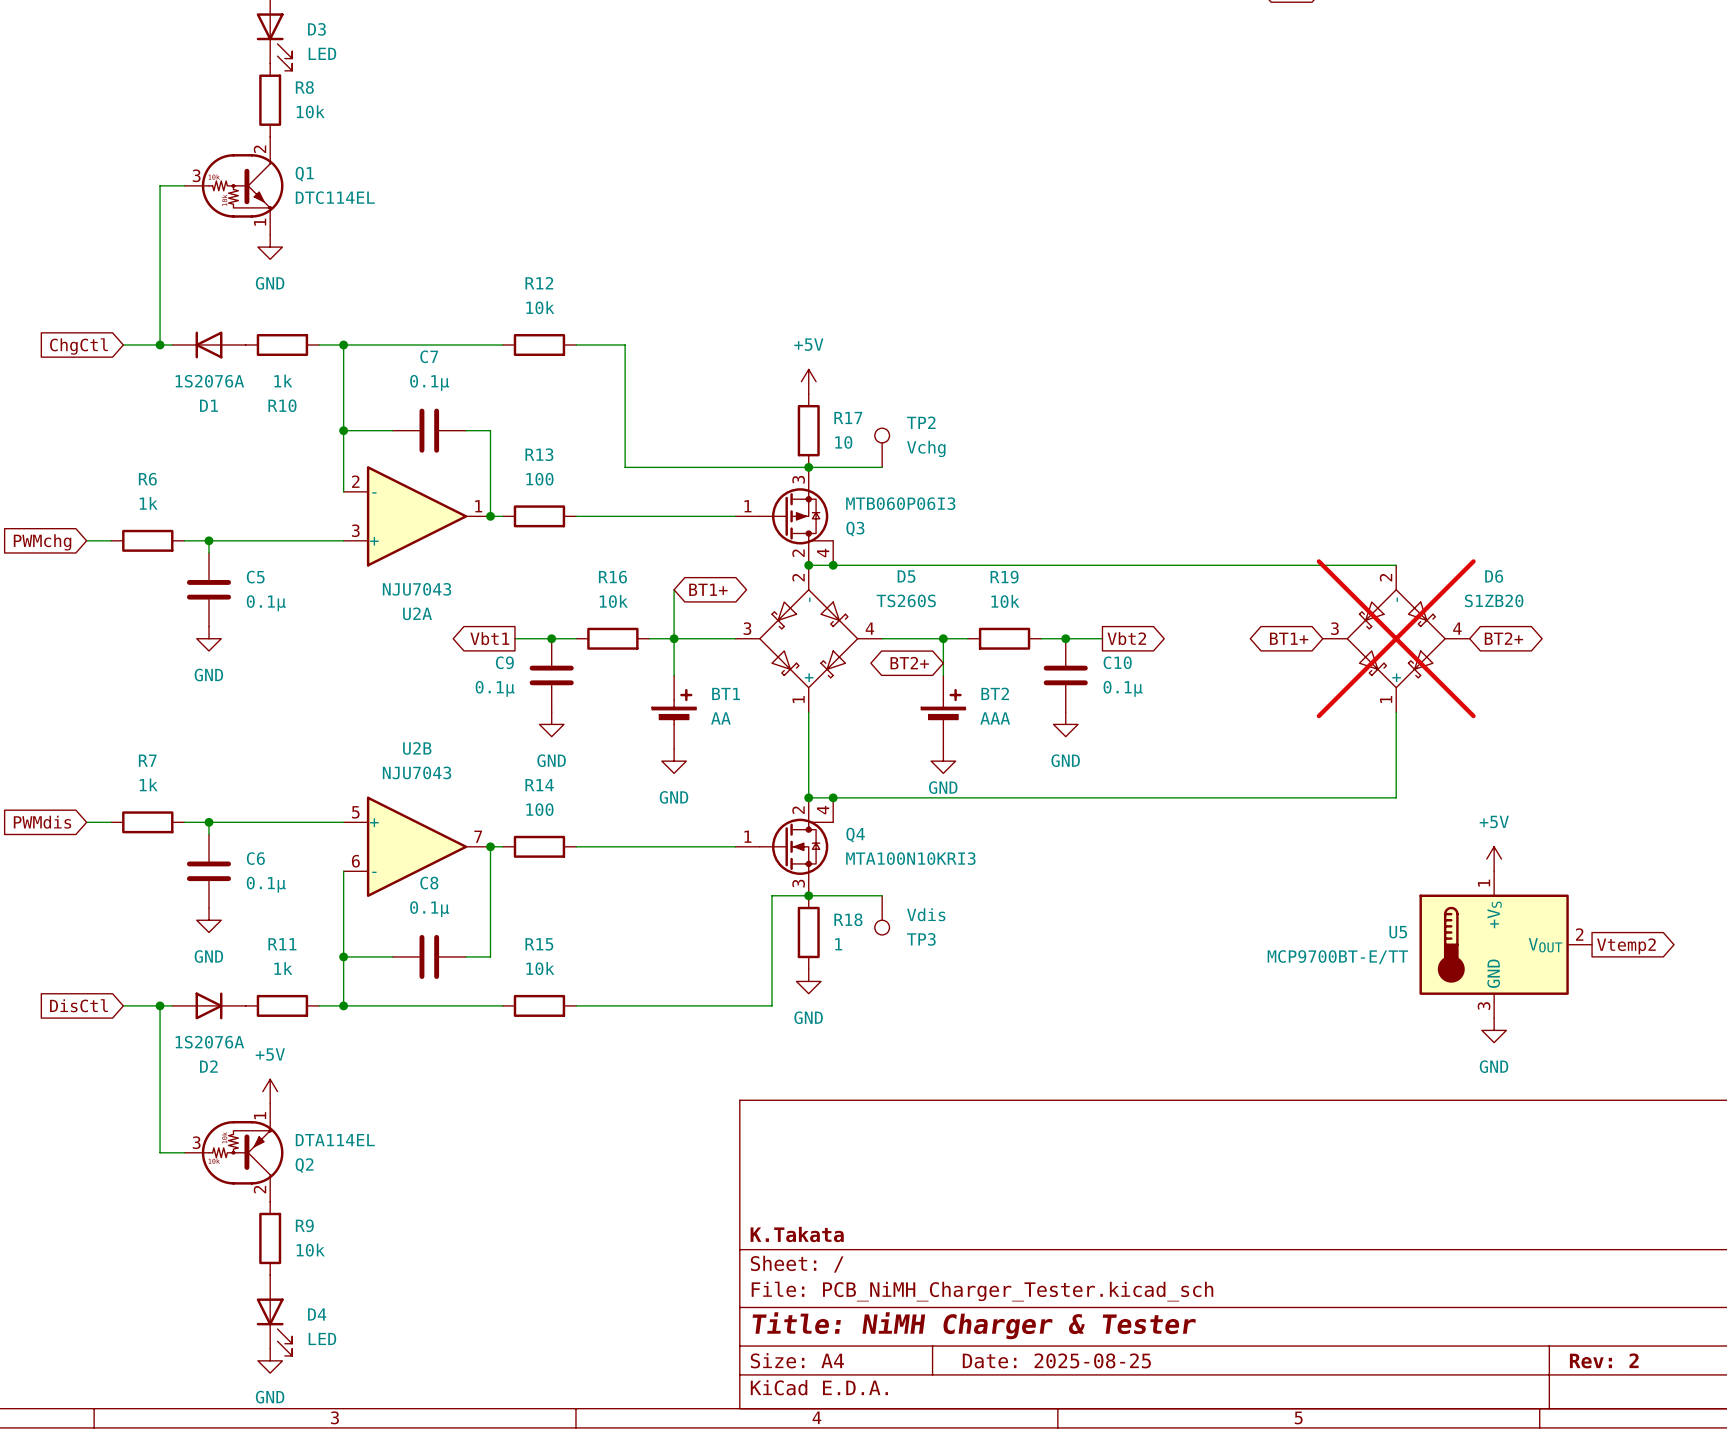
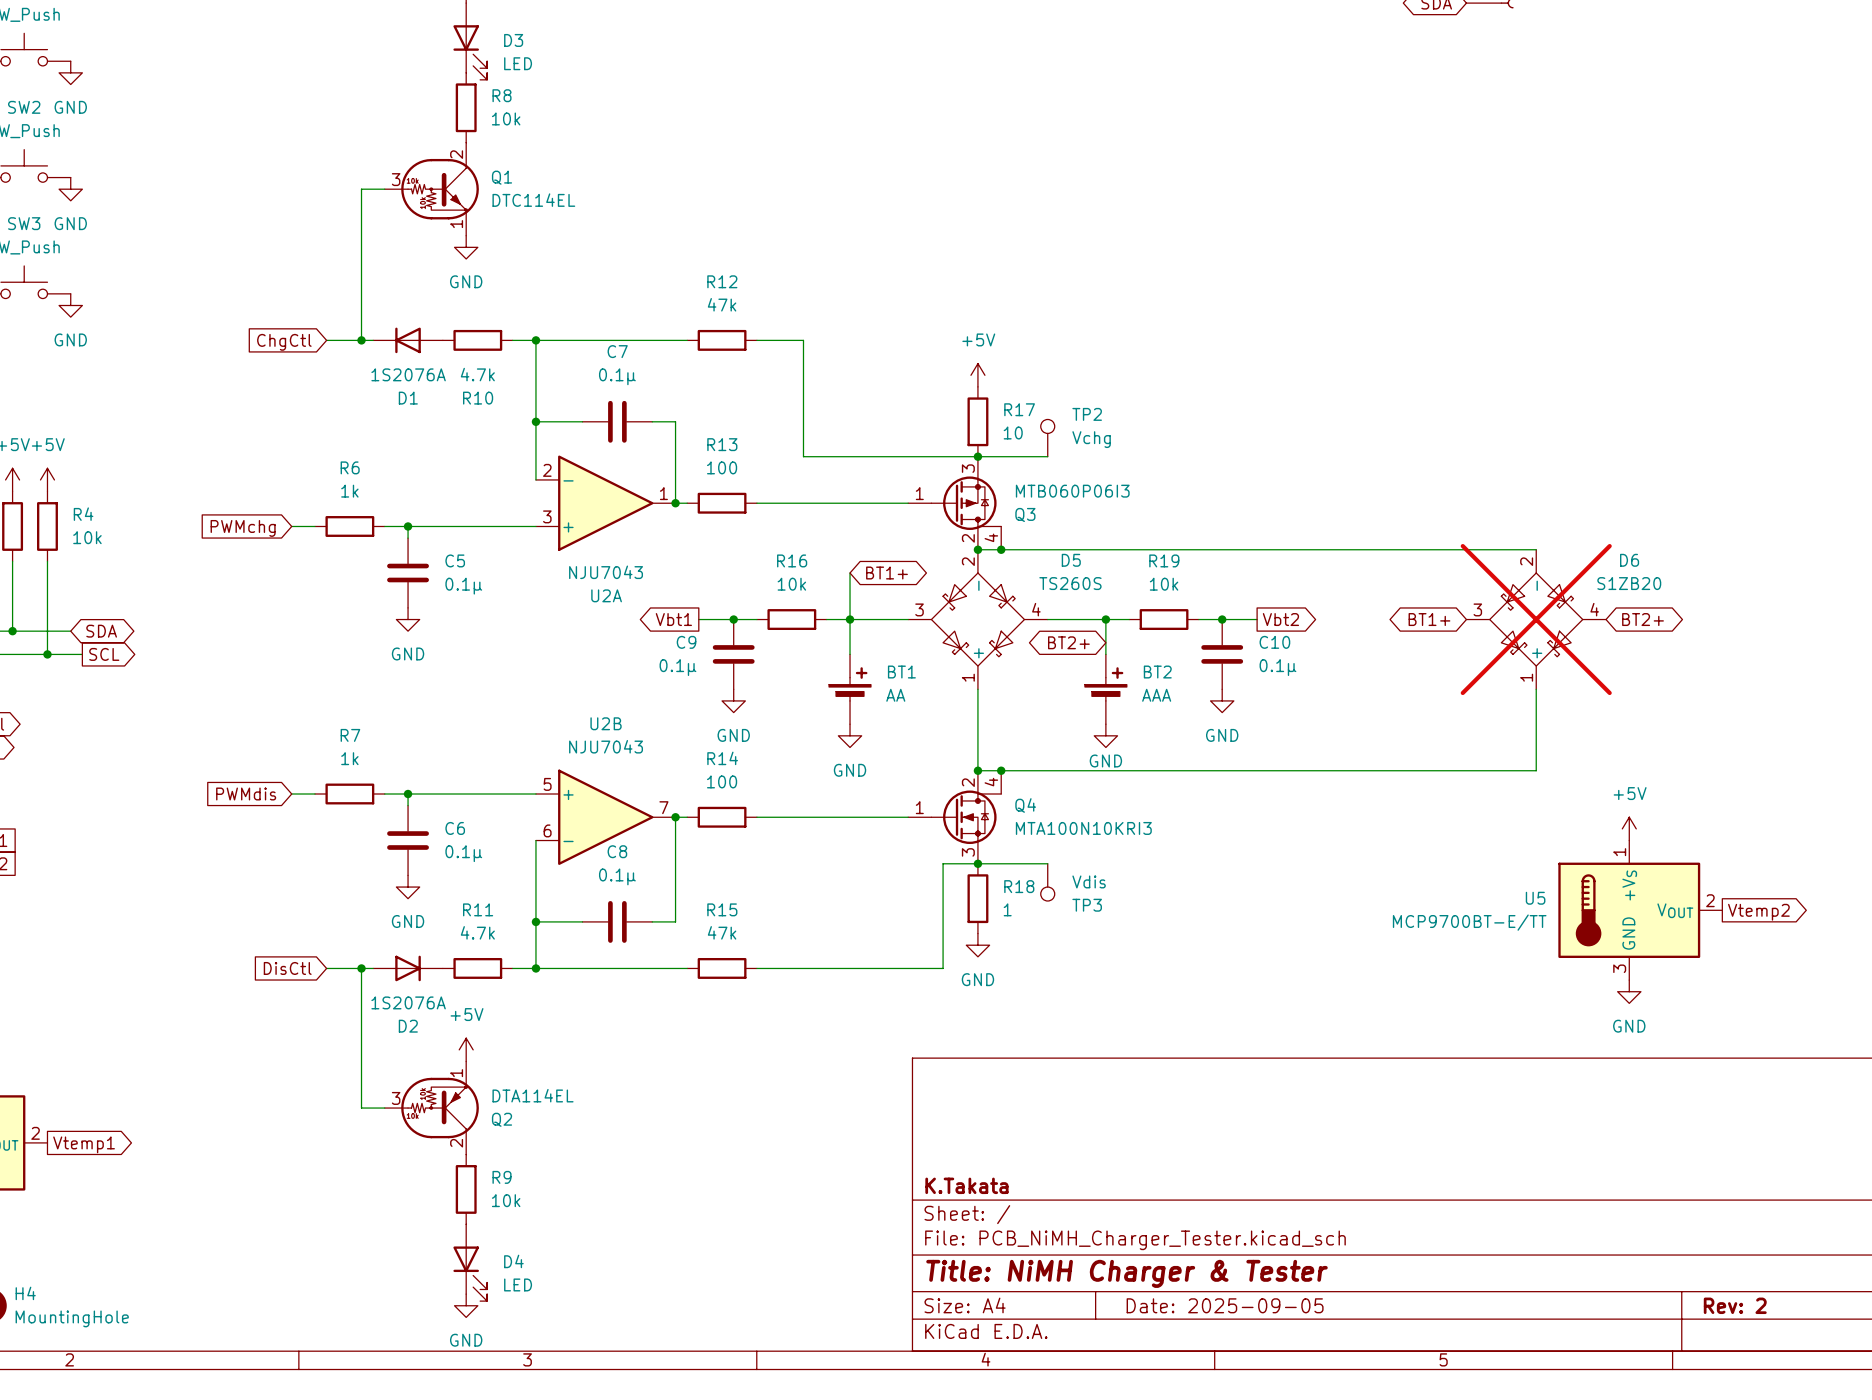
R12 value: 10k (540, 307) -> 47k (722, 304)
R10 value: 1k (283, 381) -> 4.7k (477, 374)
R11 value: 1k (283, 968) -> 4.7k (477, 932)
R15 value: 10k (540, 968) -> 47k (722, 932)
title block: Date: 2025-08-25 (1056, 1360) -> Date: 2025-09-05 (1225, 1305)

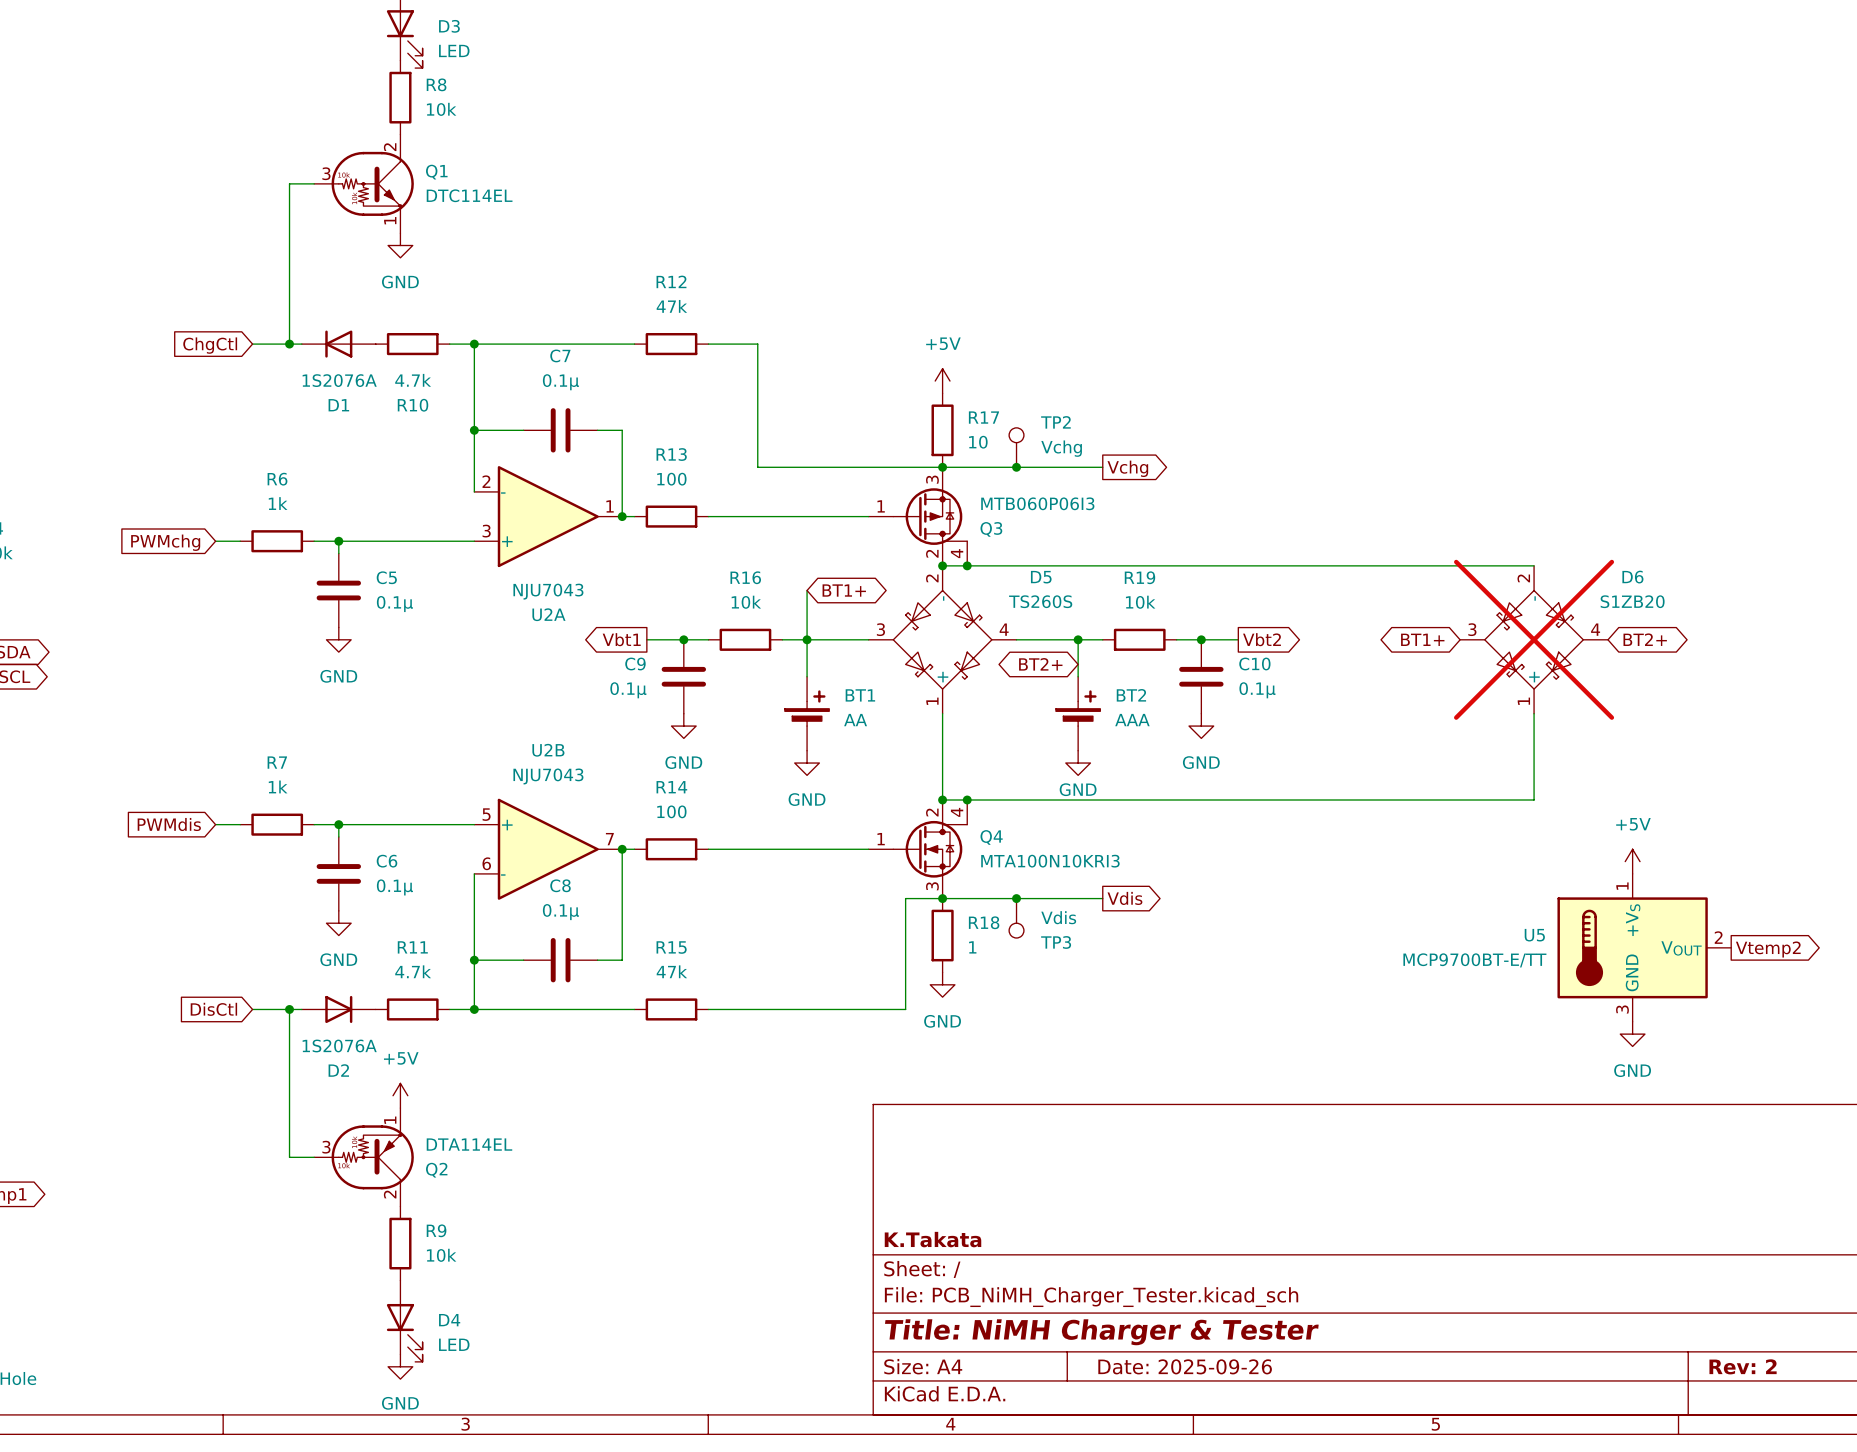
wire: none -> (1016, 467) (1102, 467)
junction: none -> (1016, 467)
global label: none -> Vchg (1127, 468)
wire: none -> (1016, 898) (1102, 898)
junction: none -> (1016, 898)
global label: none -> Vdis (1124, 898)
title block: Date: 2025-09-05 (1225, 1305) -> Date: 2025-09-26 (1185, 1366)

